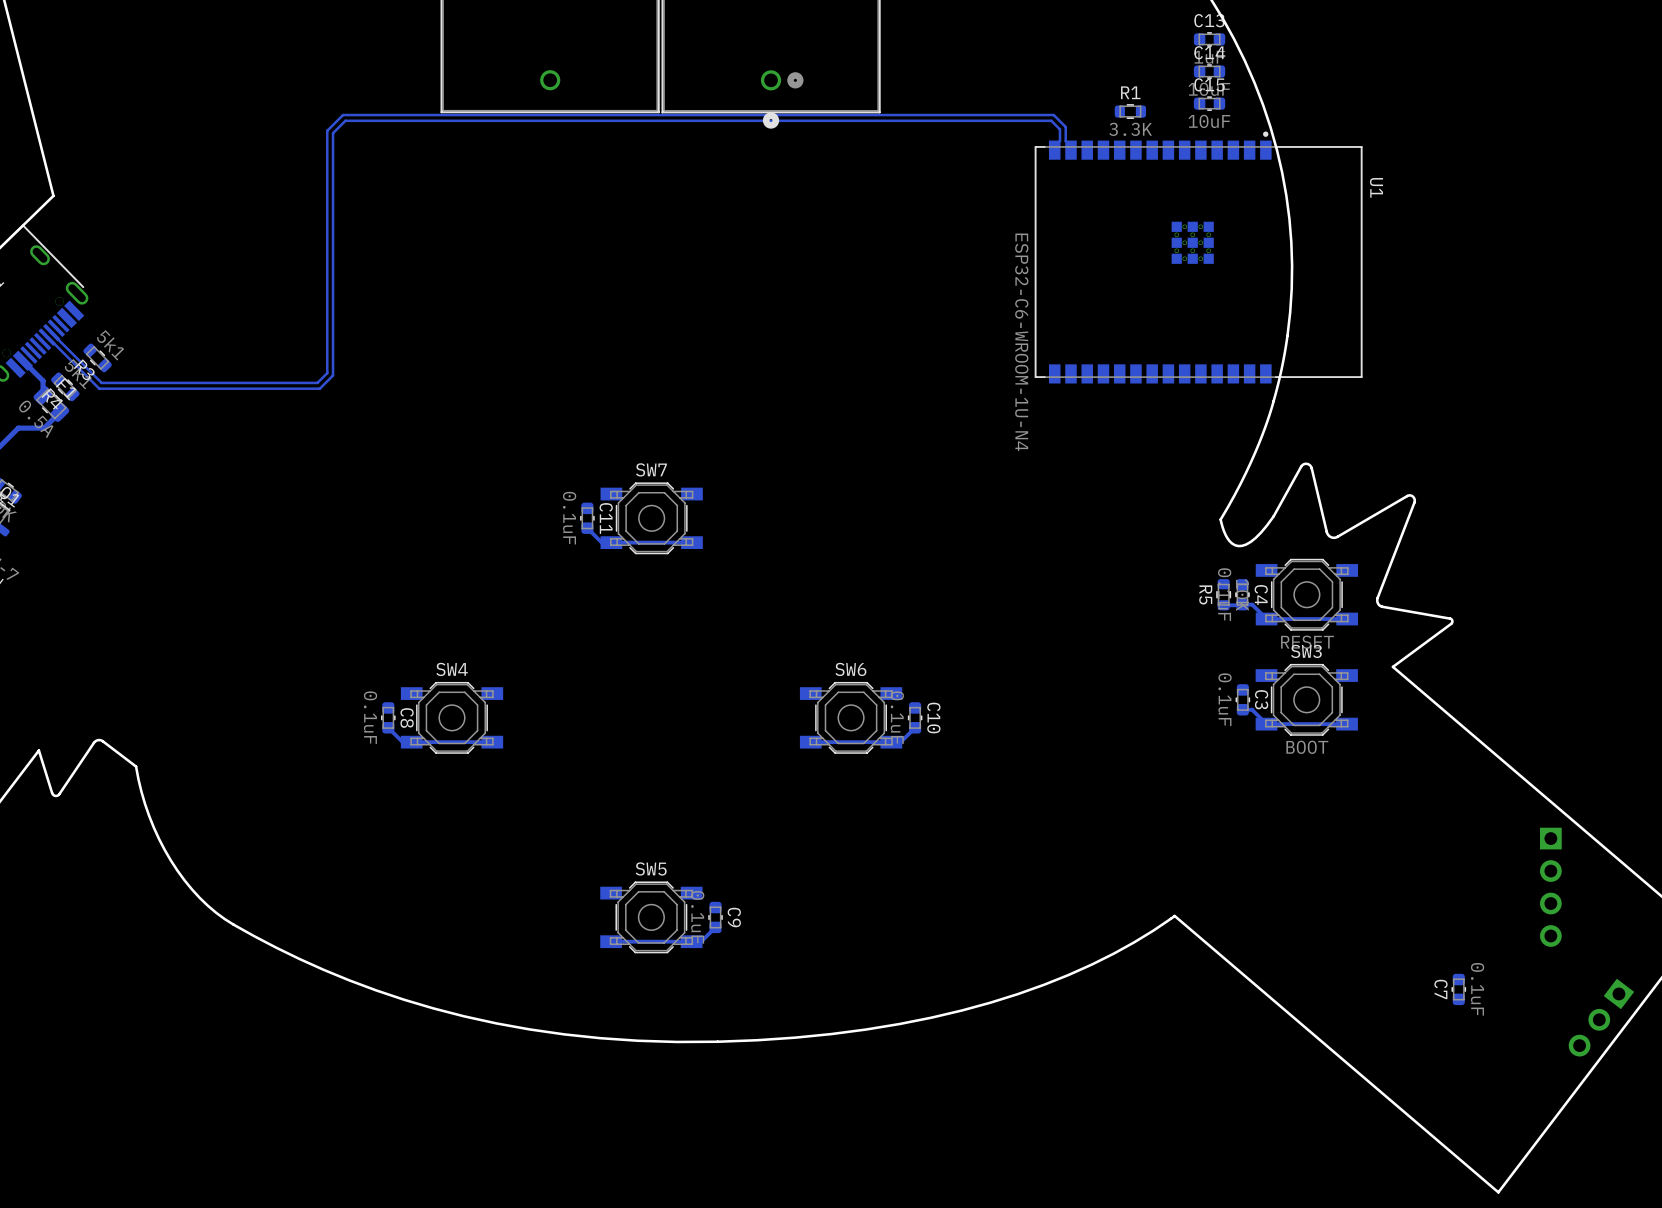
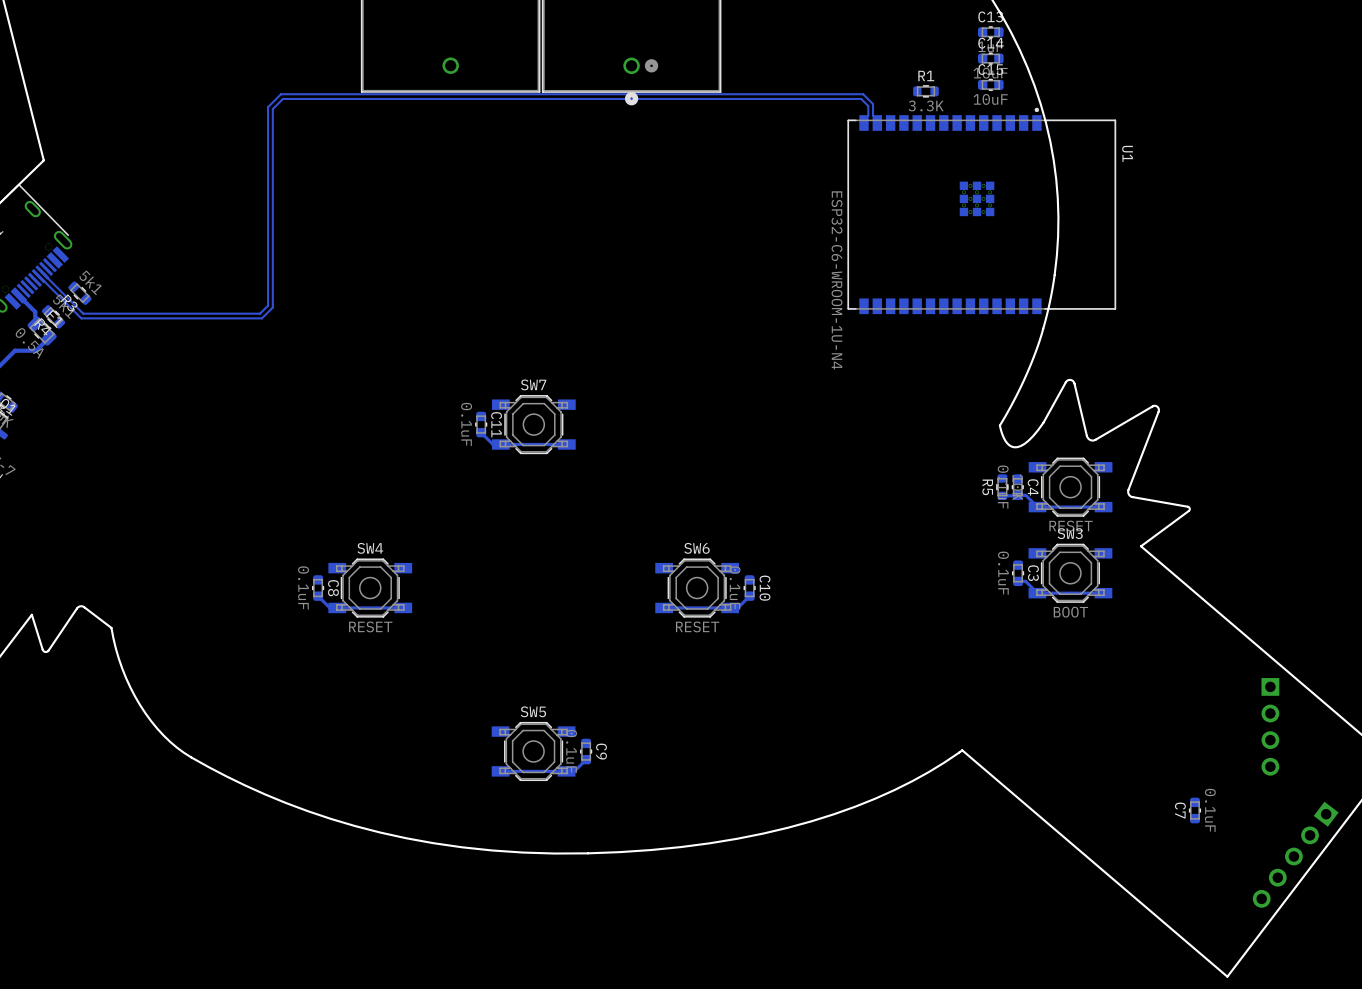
SW4 value: none -> RESET (370, 626)
SW6 value: none -> RESET (697, 626)
part: none -> (1295, 854)

